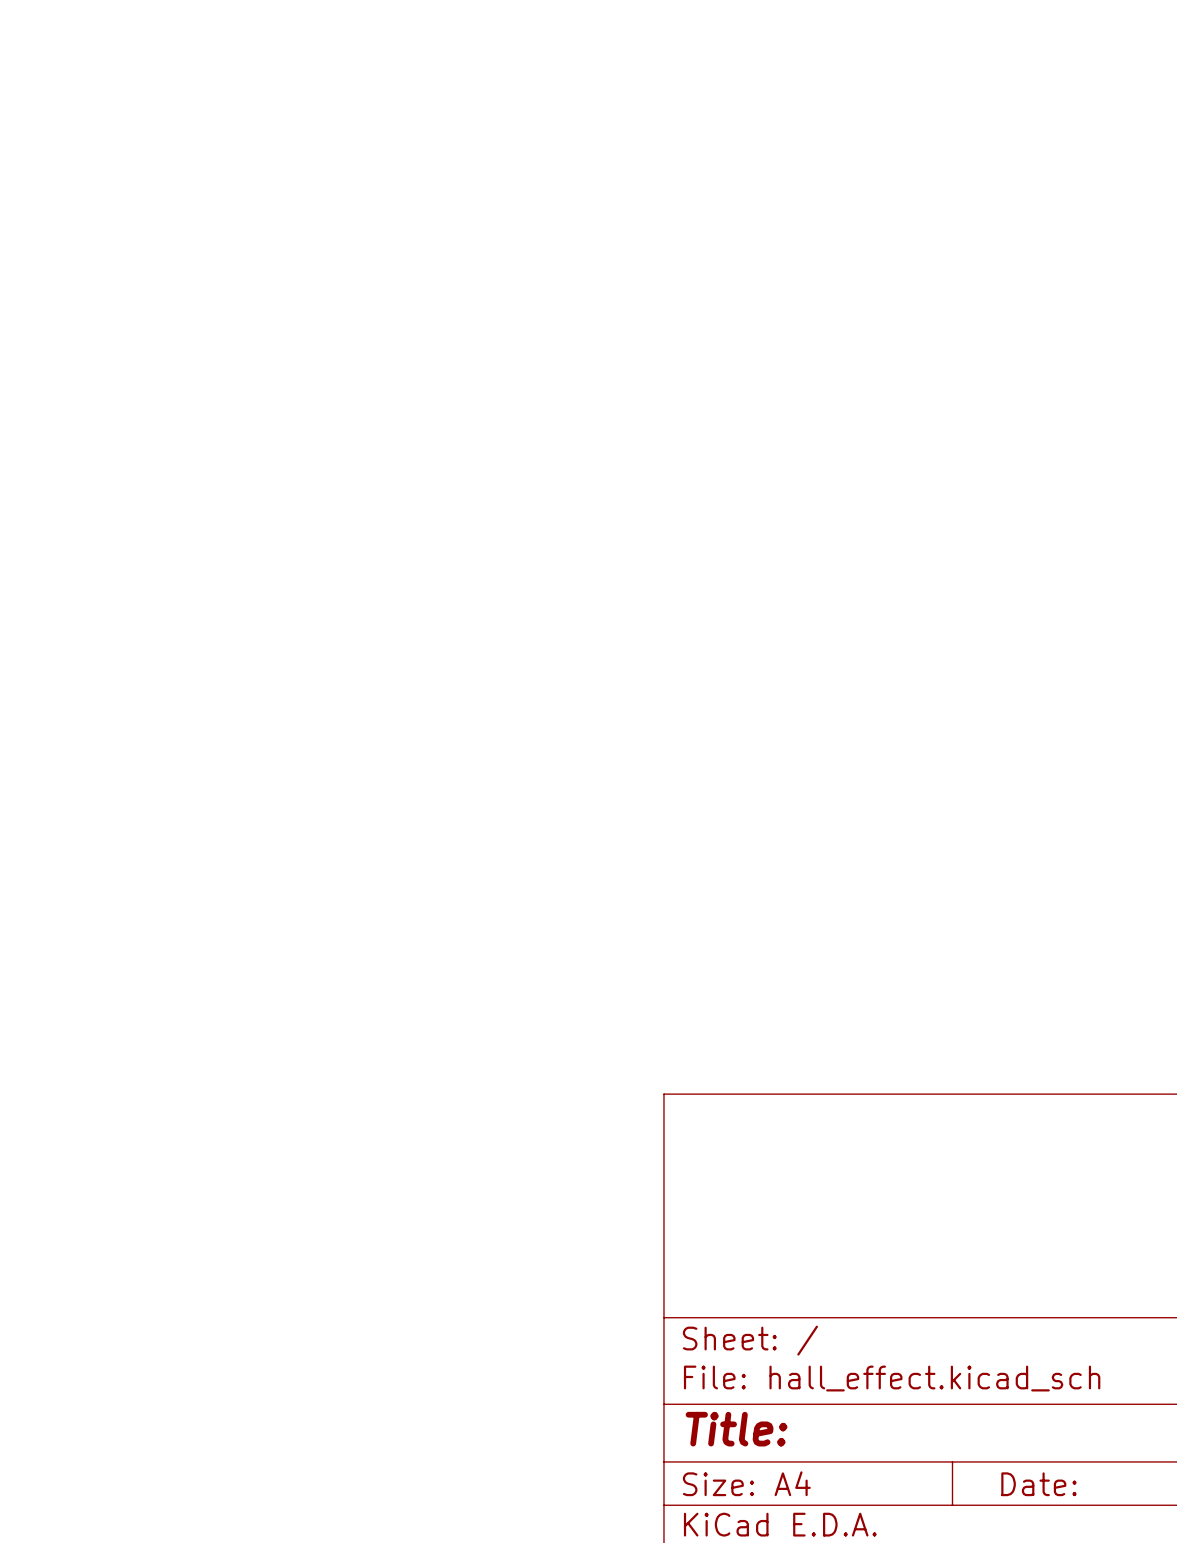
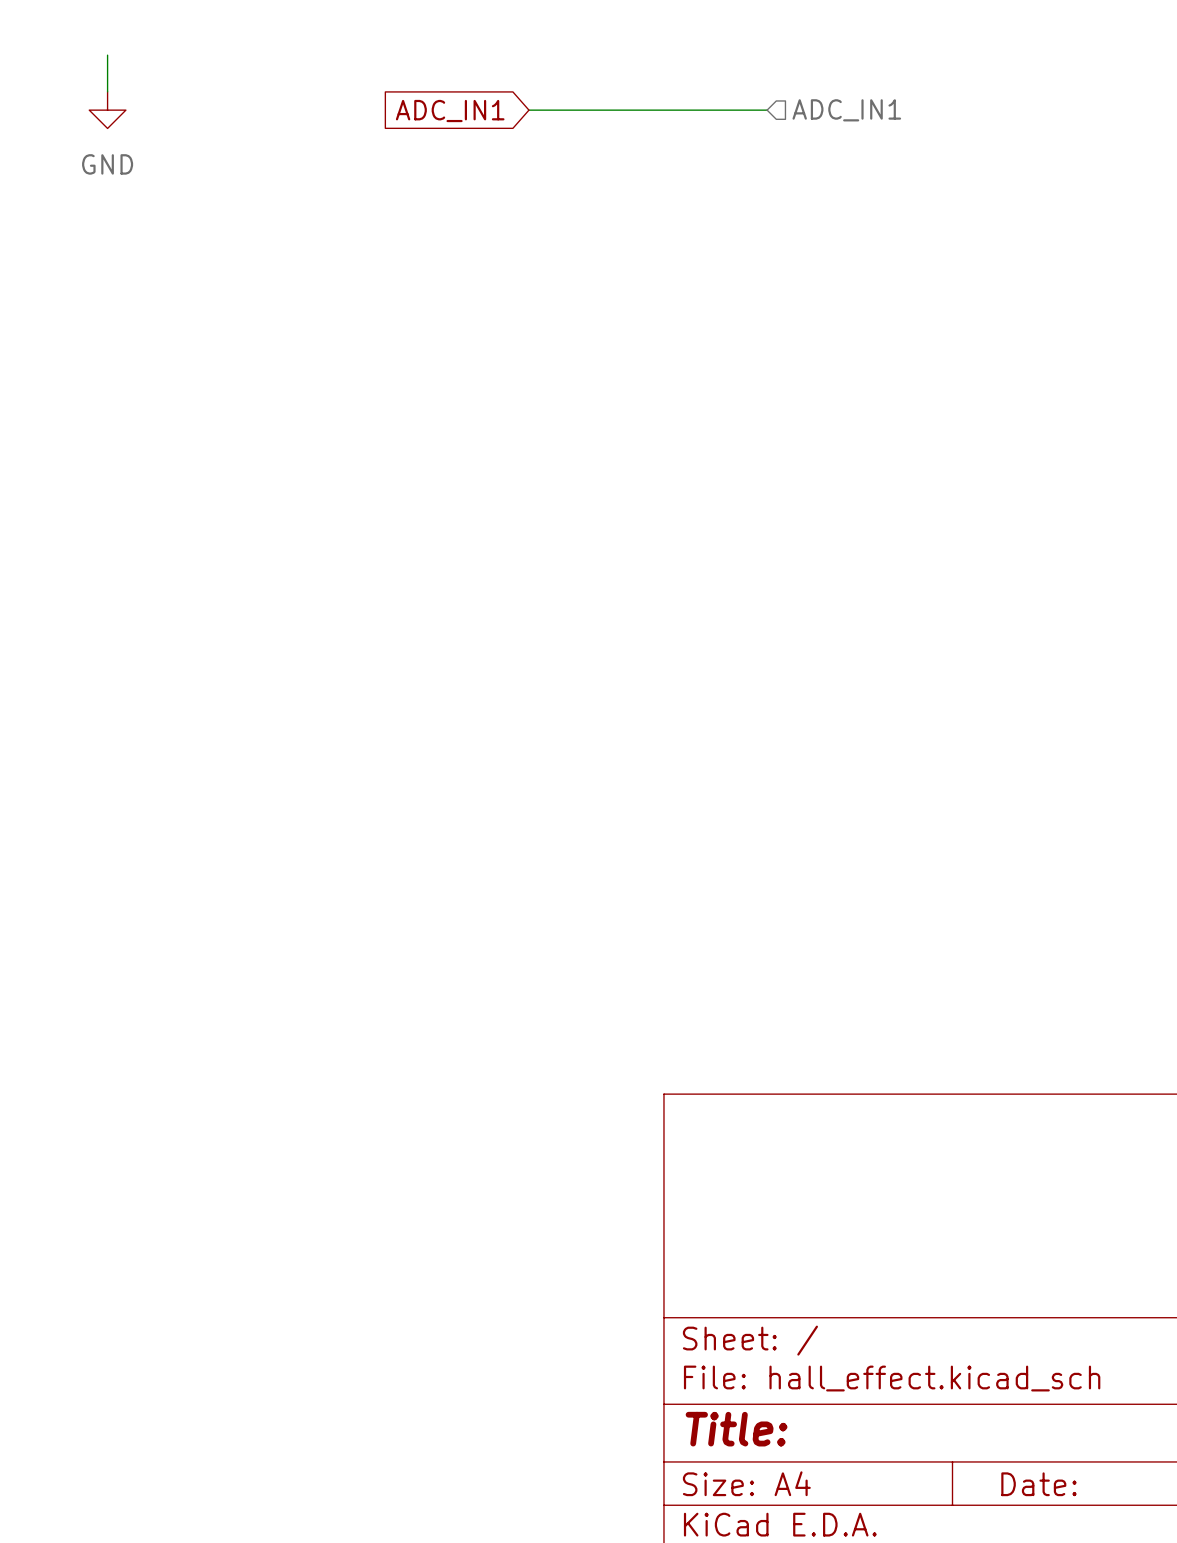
wire: none -> (107, 55) (107, 91)
power symbol: none -> GND (107, 110)
wire: none -> (528, 110) (767, 110)
hierarchical label: none -> ADC_IN1 (846, 110)
global label: none -> ADC_IN1 (450, 111)

